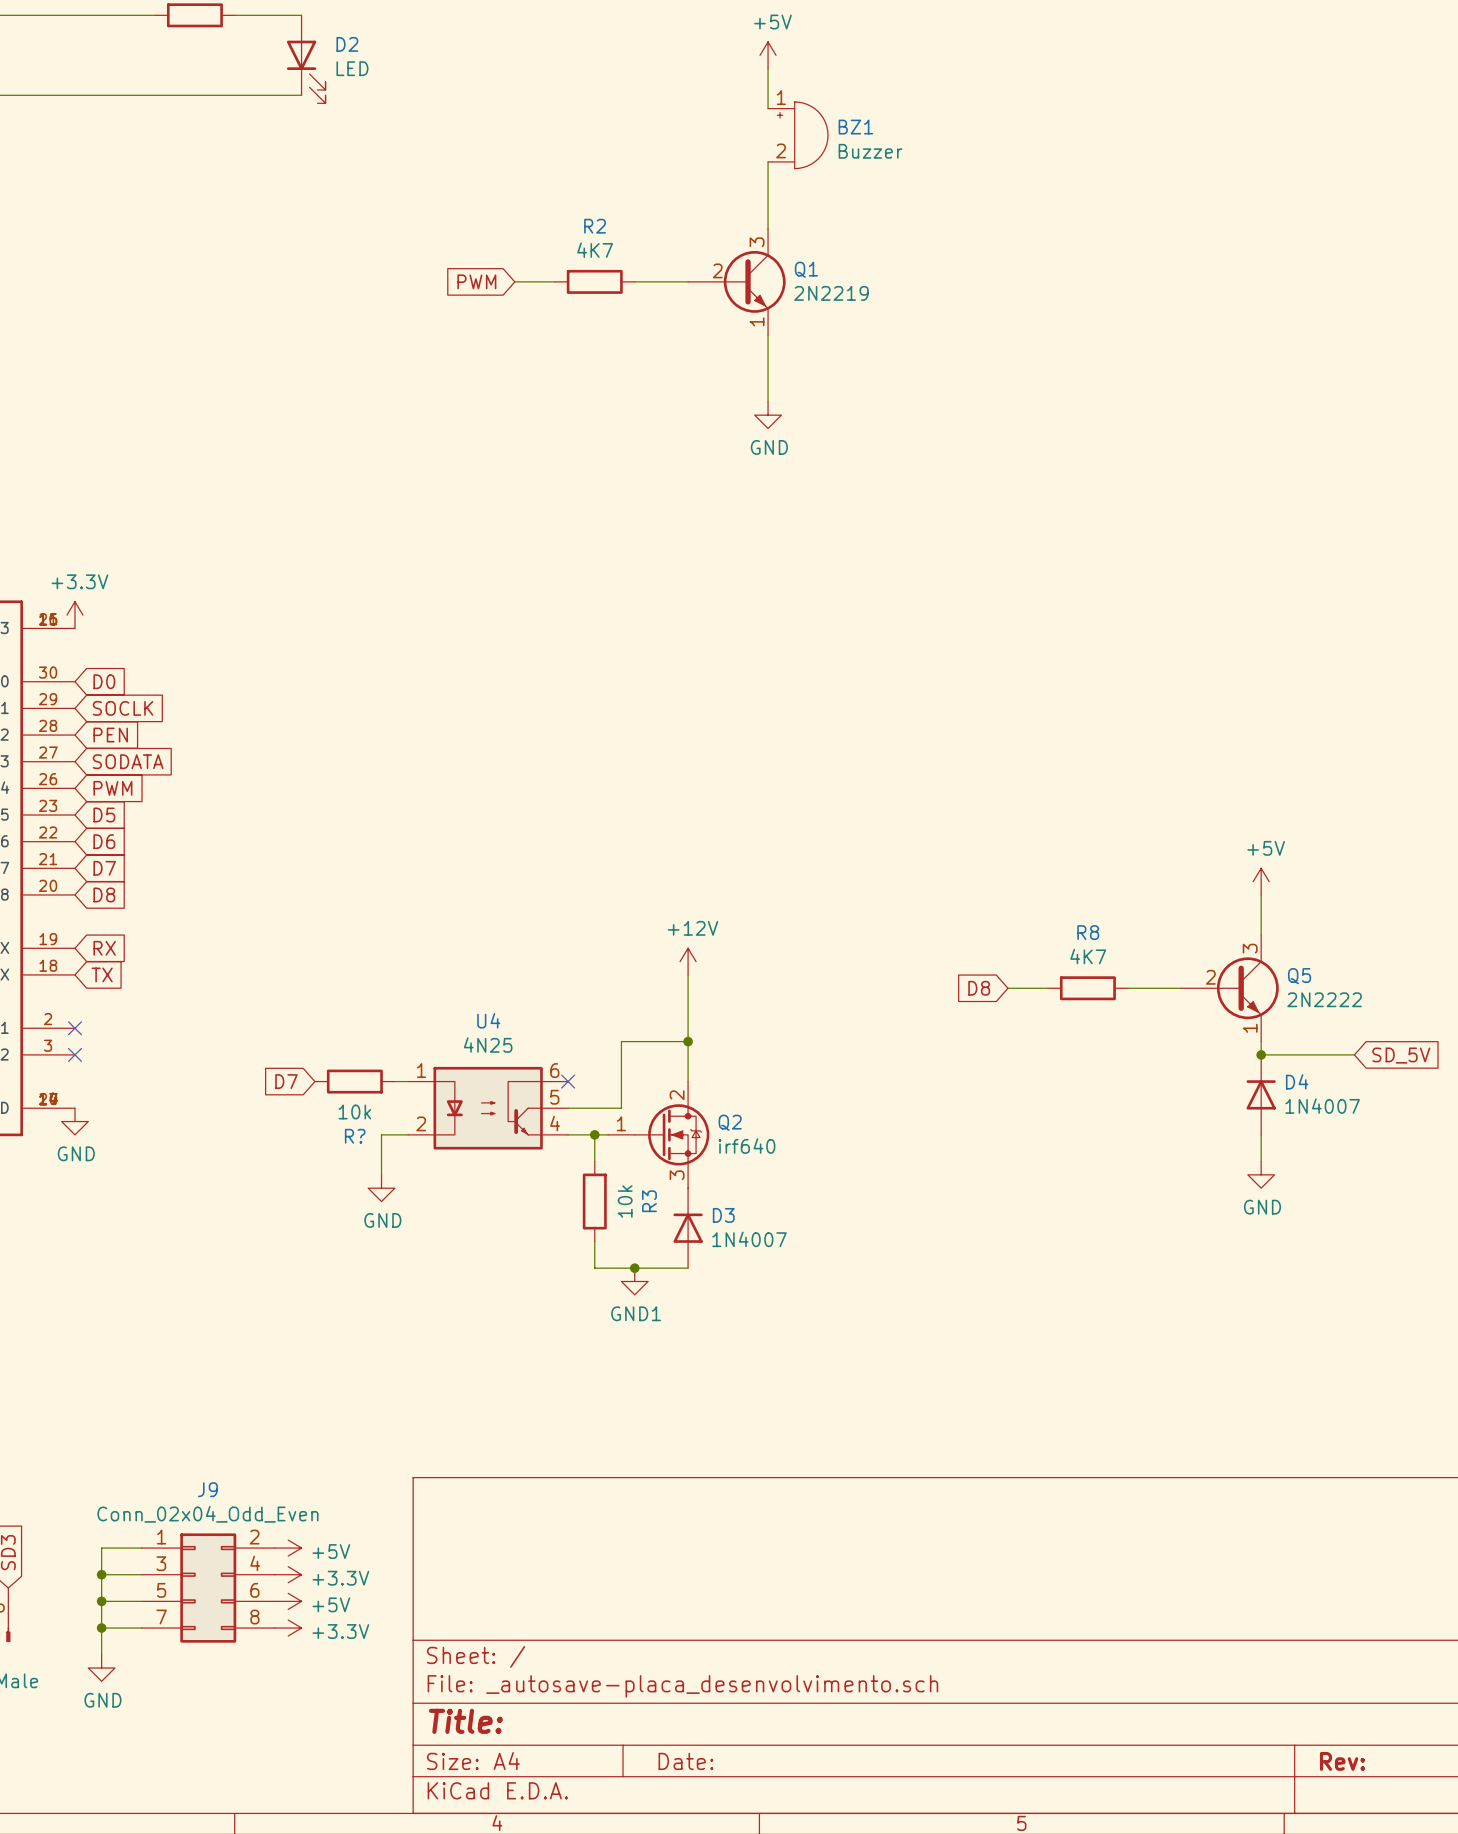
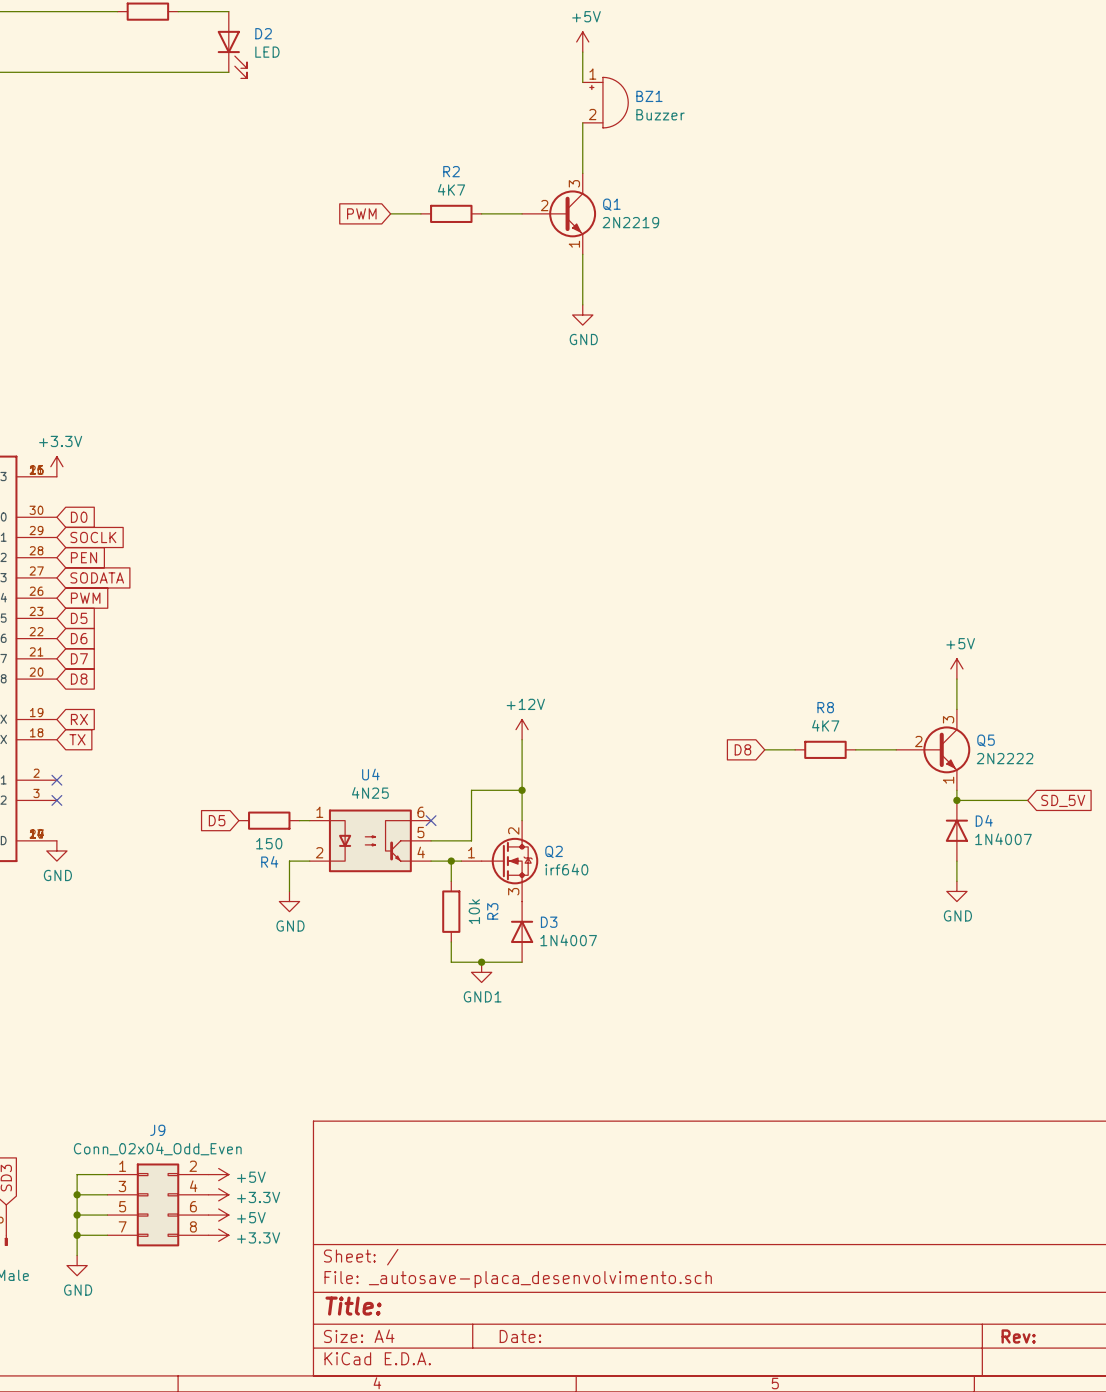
global label: D7 (286, 1081) -> D5 (217, 820)
R? value: 10k (354, 1111) -> 150 (269, 843)
R? name: R? (355, 1136) -> R4 (269, 861)

